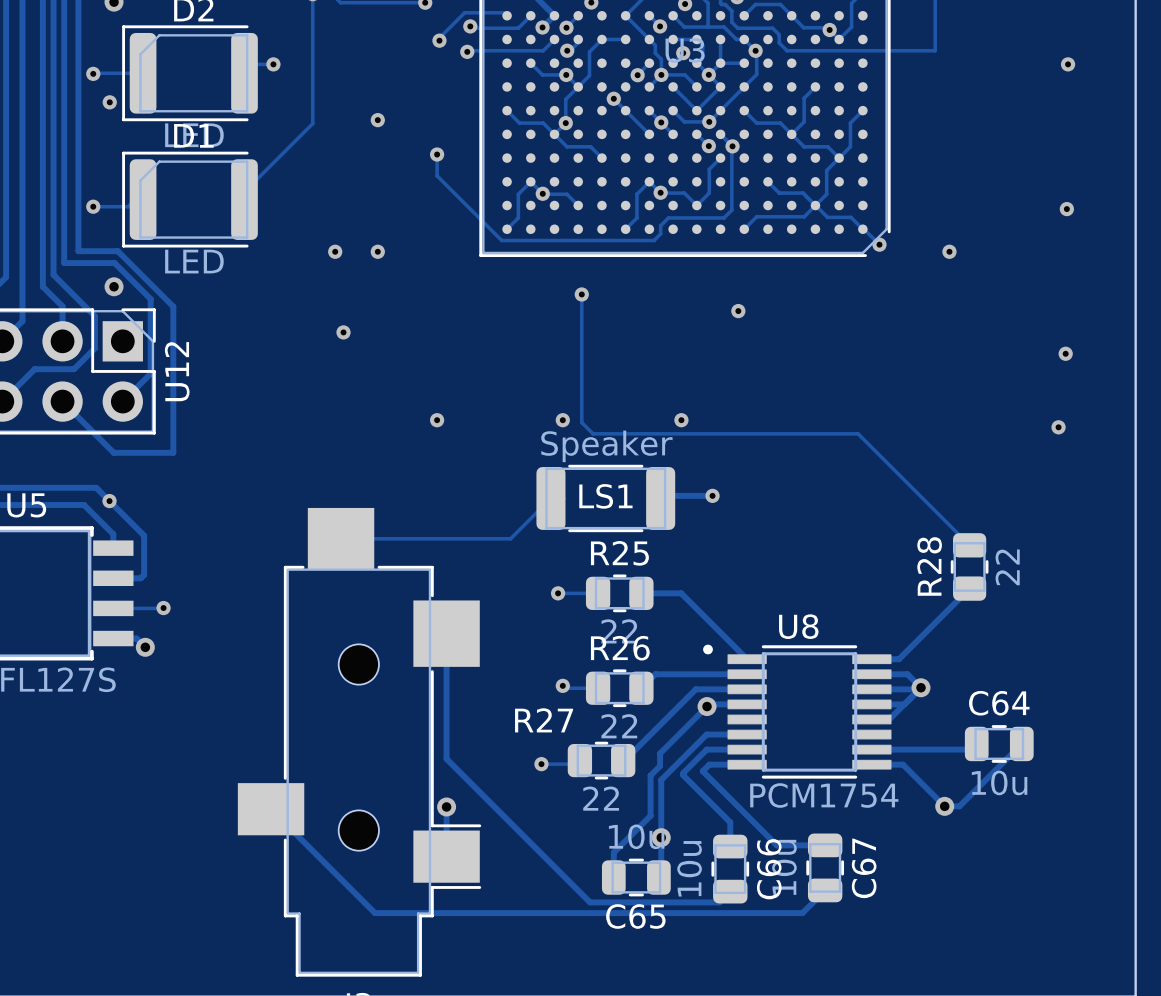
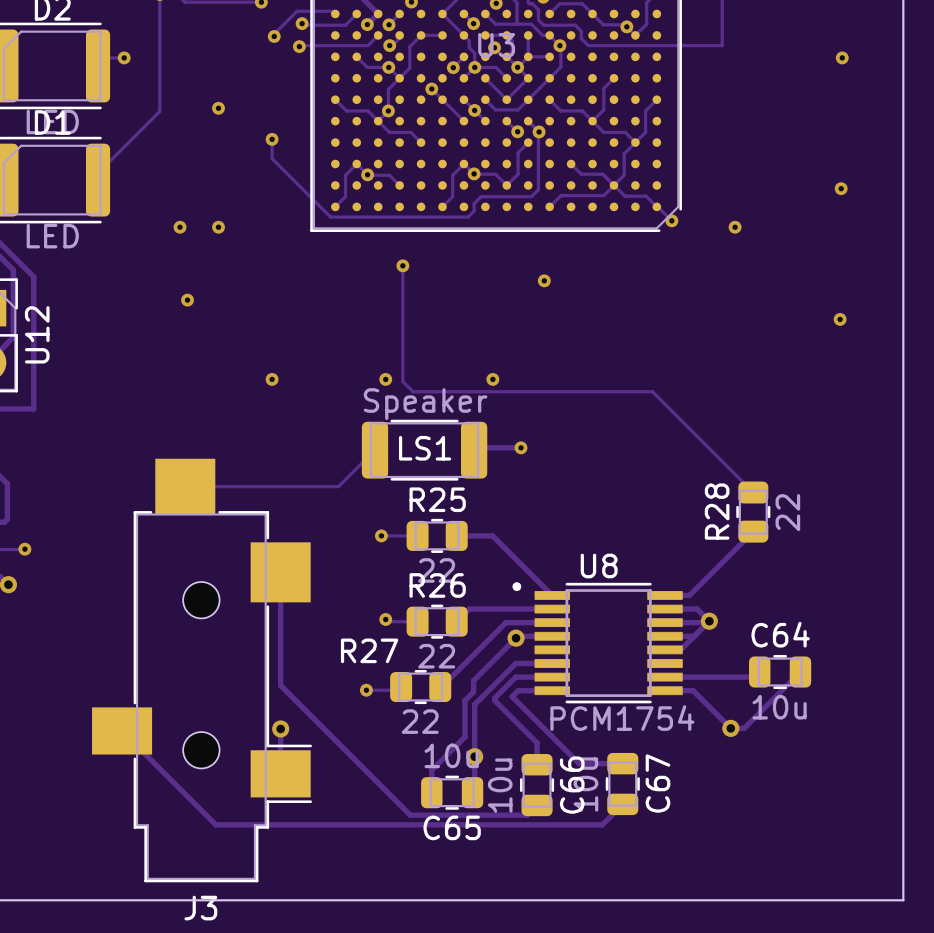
via: (709, 121) -> none
via: (1058, 427) -> none

